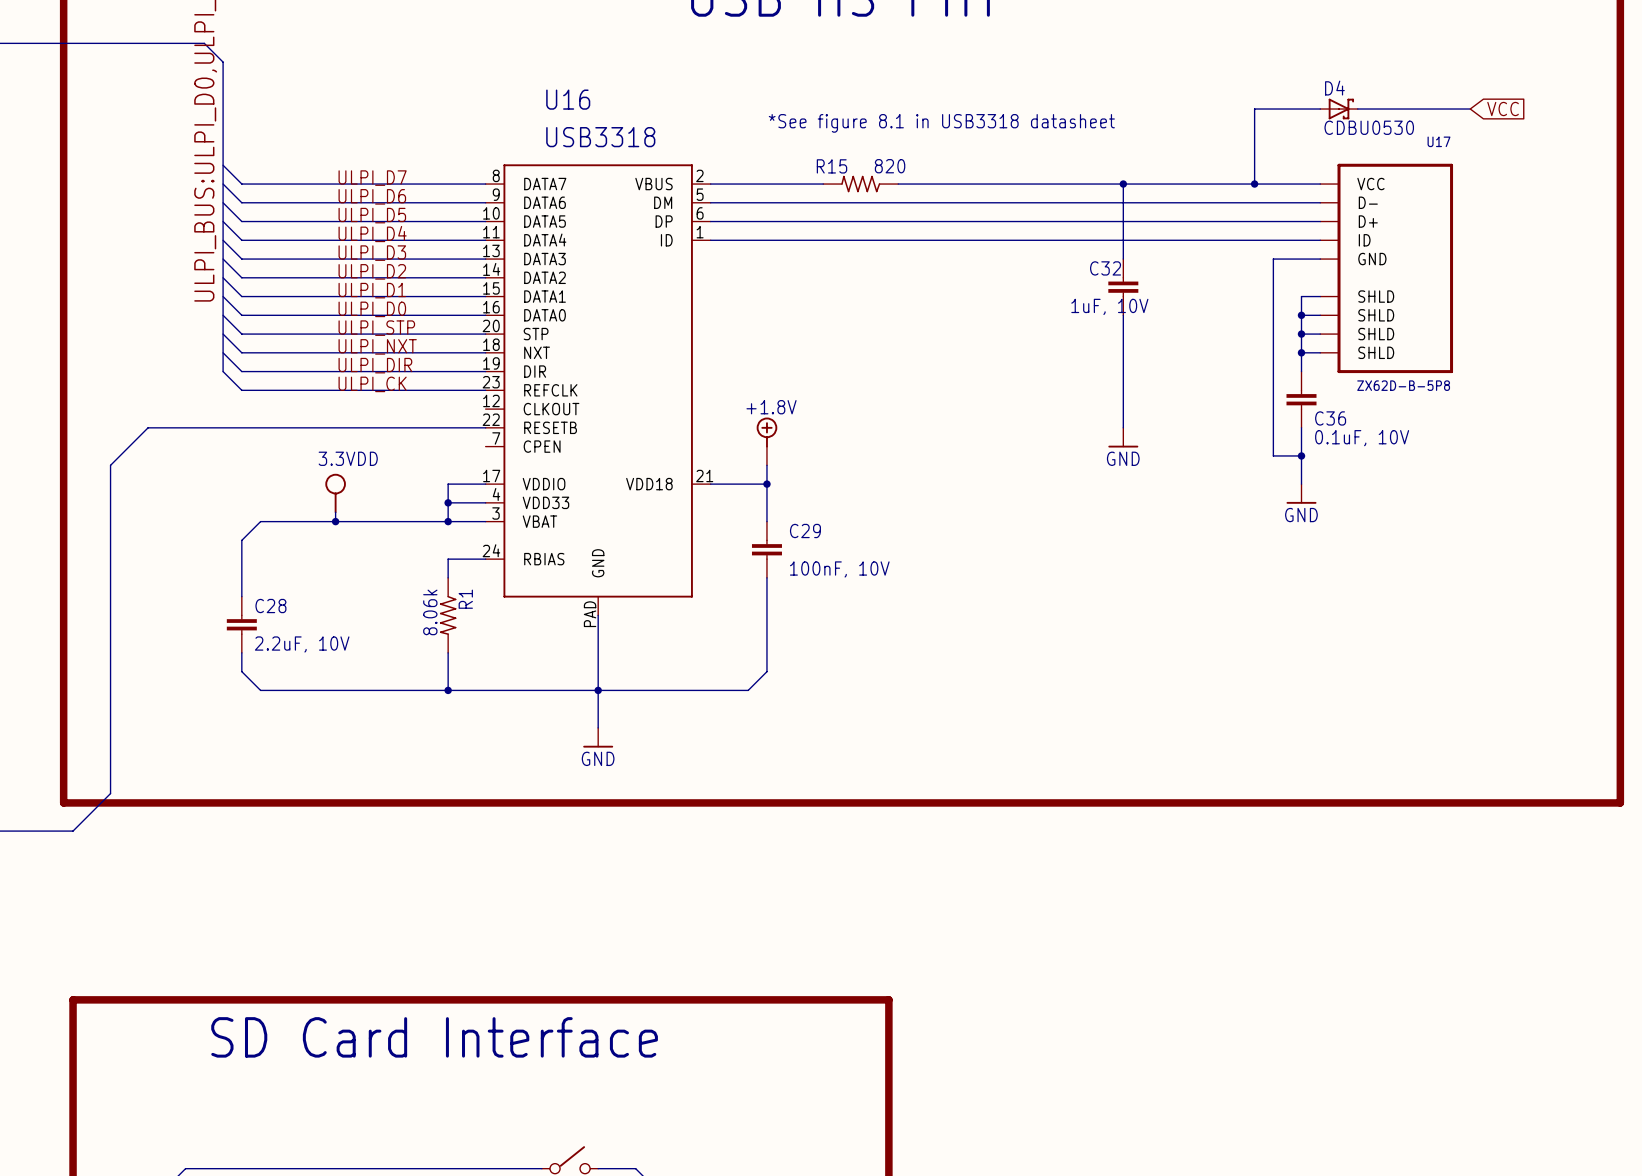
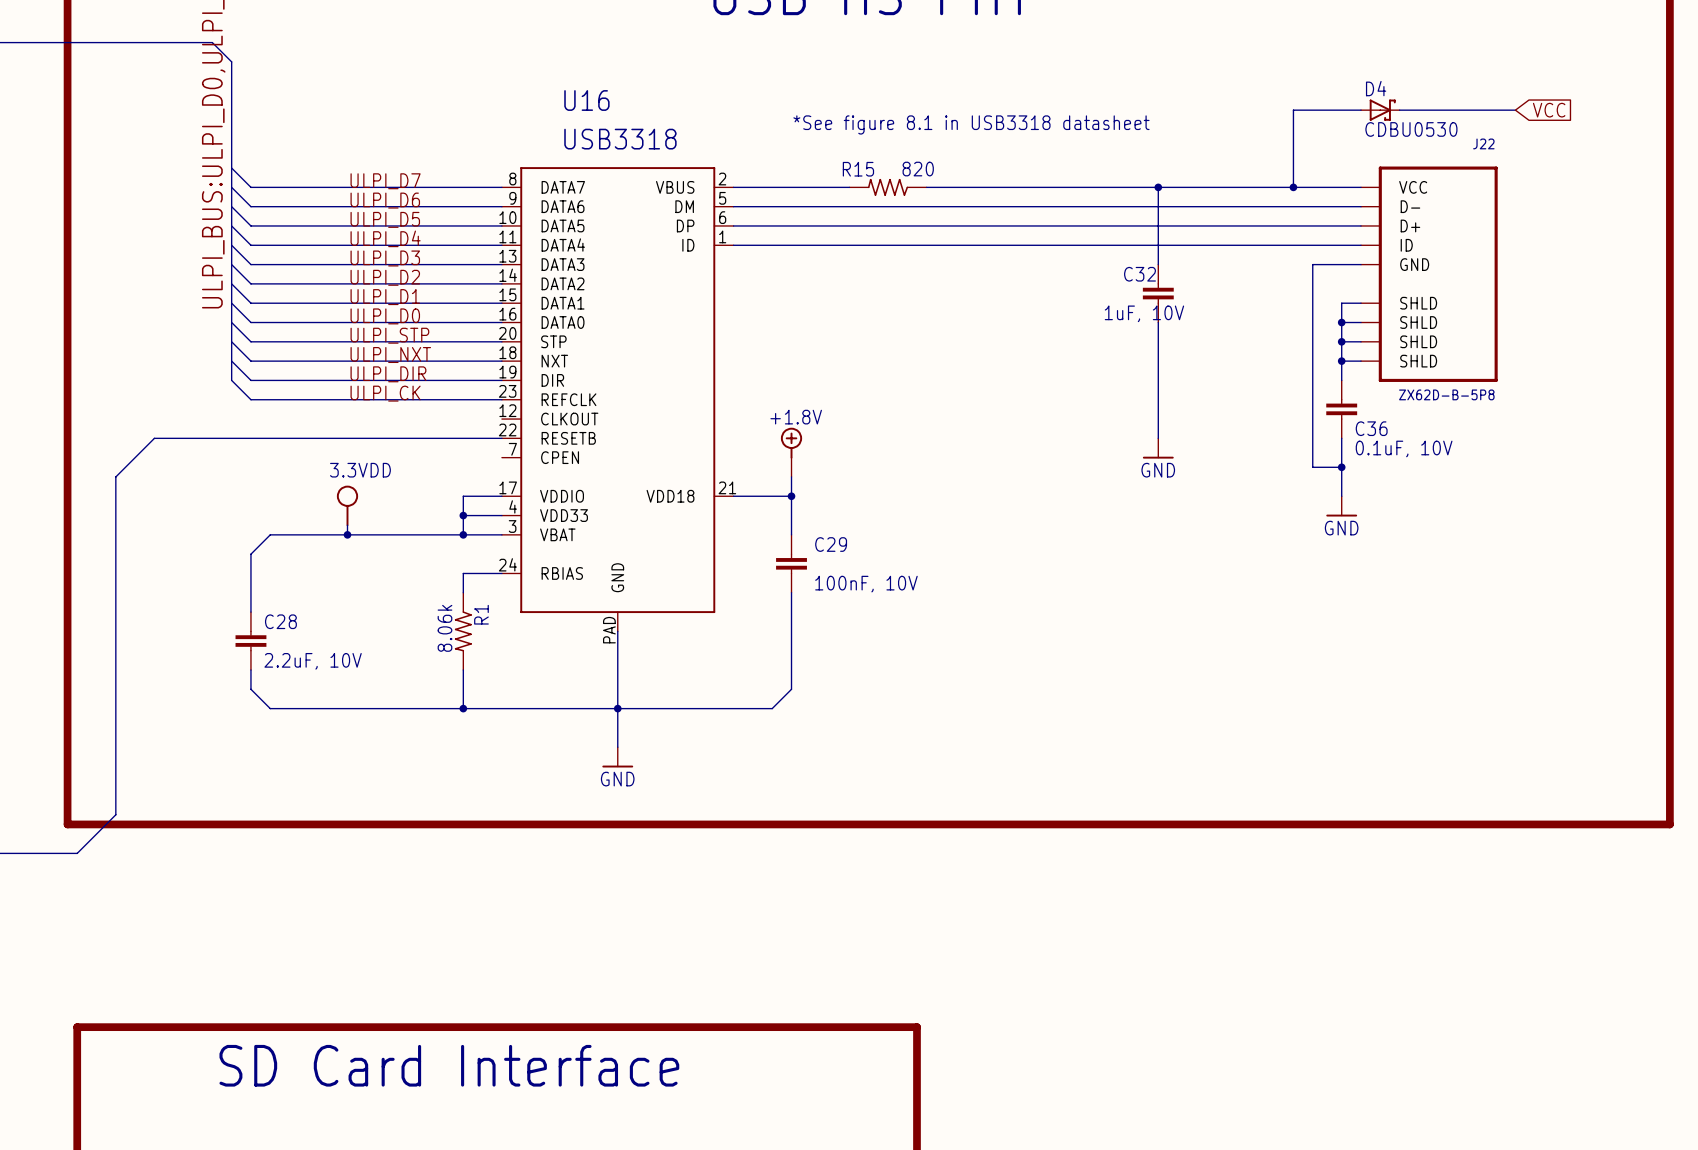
U17 name: U17 (1438, 141) -> J22 (1483, 143)

